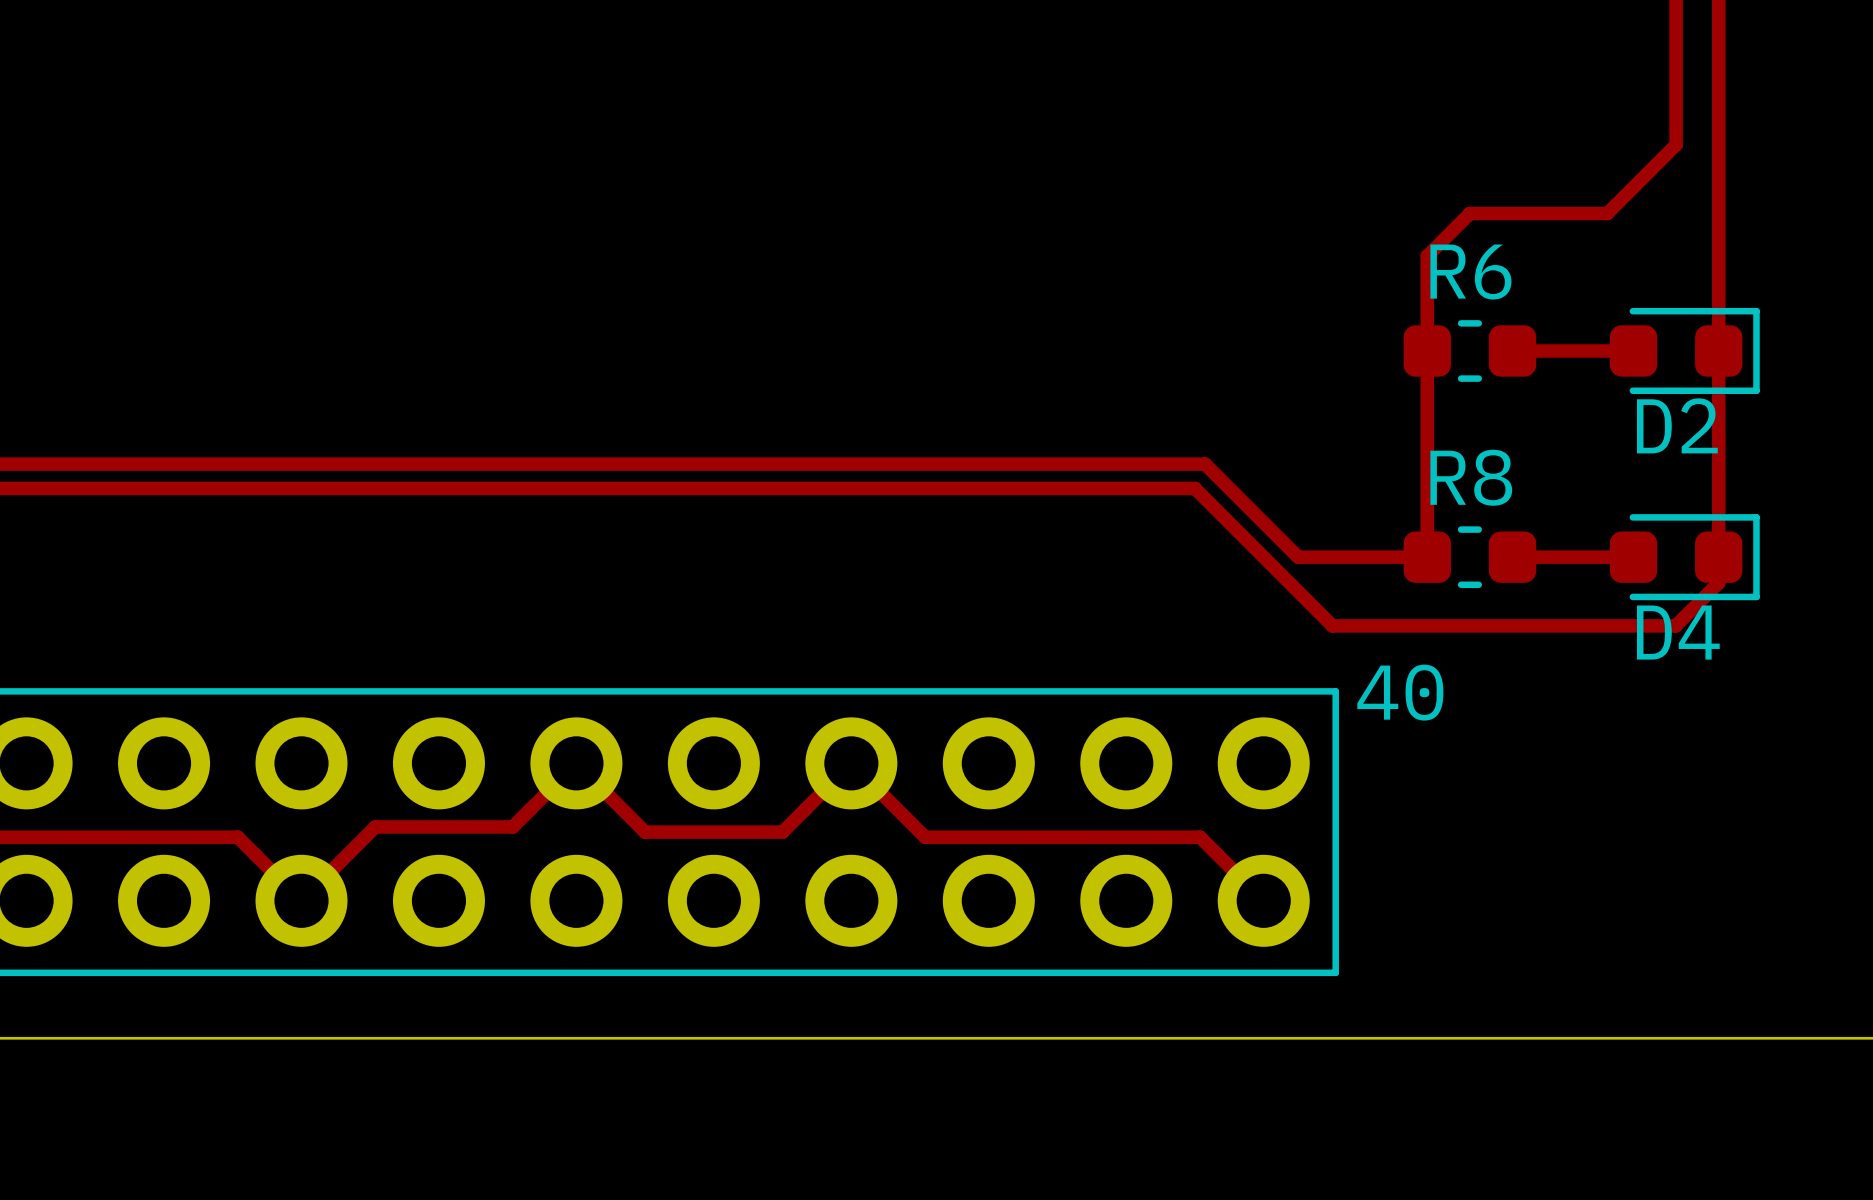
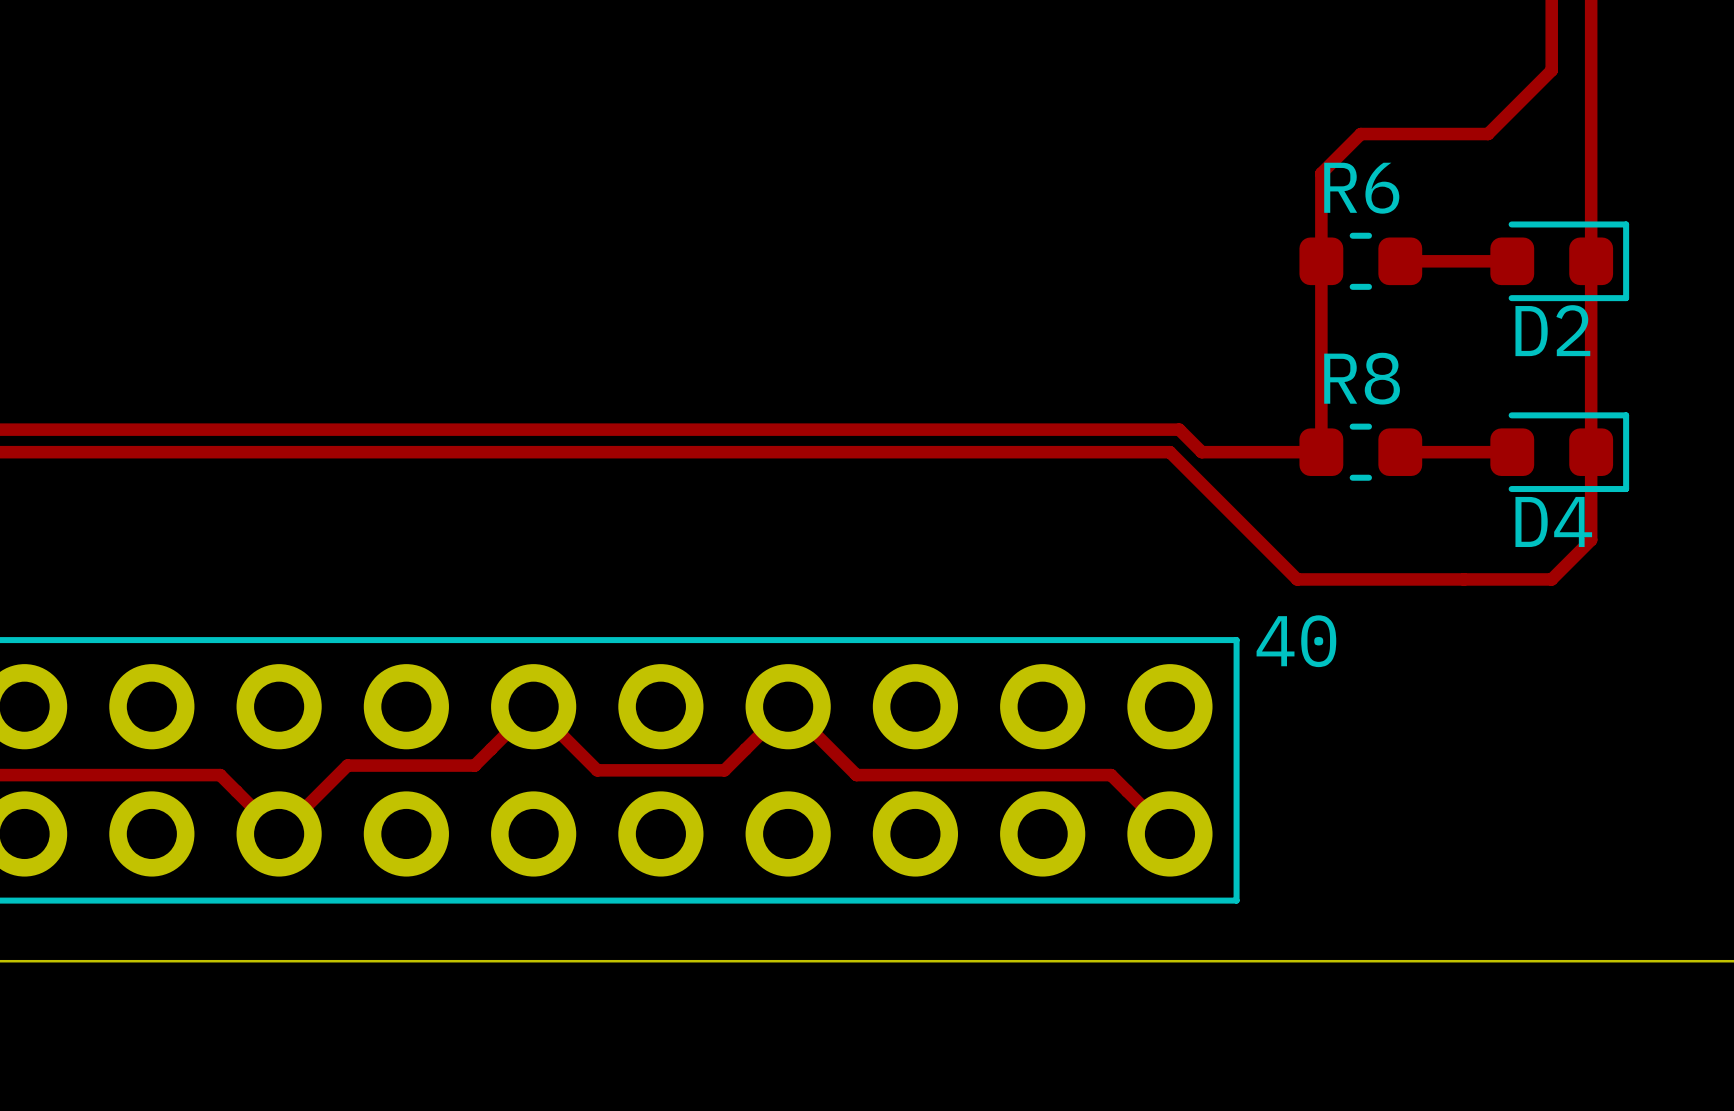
track: (1676, 76) (1676, 144) (1607, 213) (1469, 213) (1427, 256) -> (1551, 70) (1488, 134) (1360, 134) (1321, 173) (1321, 237)
R6 position: (1469, 350) -> (1360, 261)
track: (1512, 350) (1633, 350) -> (1400, 261) (1512, 261)
D2 position: (1684, 350) -> (1559, 261)
track: (1205, 464) (1298, 557) (1427, 557) (1427, 488) -> (1115, 429) (1179, 429) (1201, 452) (1321, 452)
track: (1195, 488) (1332, 625) (1401, 625) -> (1106, 452) (1169, 452) (1297, 579)
R8 position: (1469, 557) -> (1360, 452)
track: (1512, 557) (1633, 557) -> (1400, 452) (1512, 452)
D4 position: (1684, 557) -> (1559, 452)

